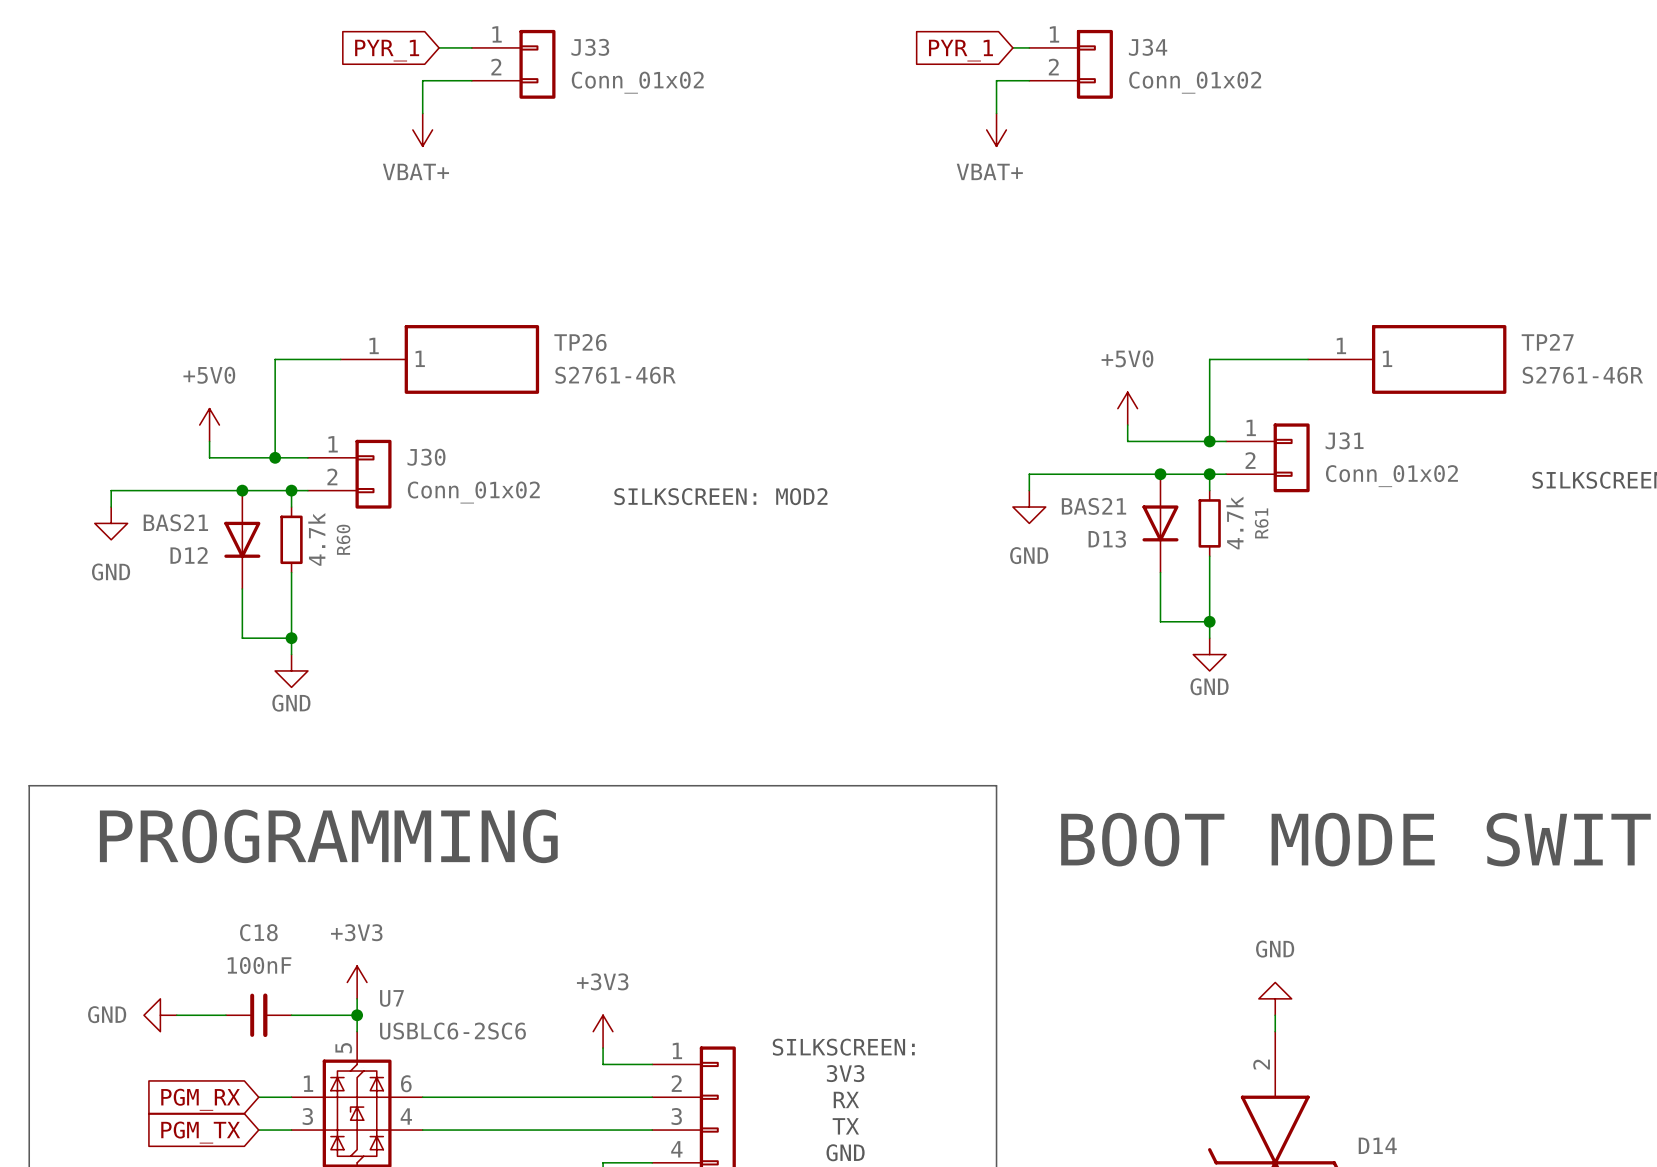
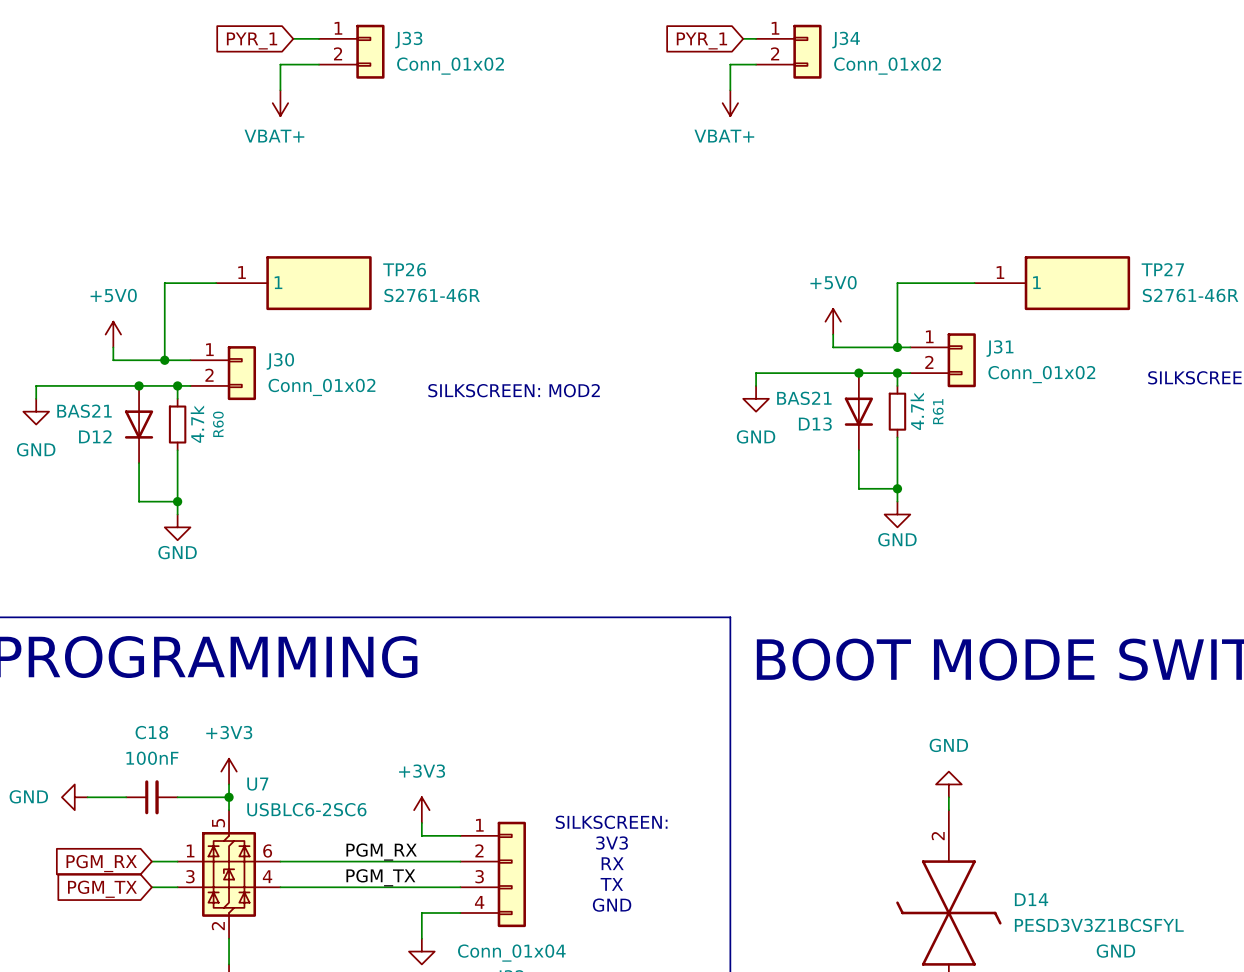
label: none -> PGM_RX (381, 852)
label: none -> PGM_TX (380, 877)

